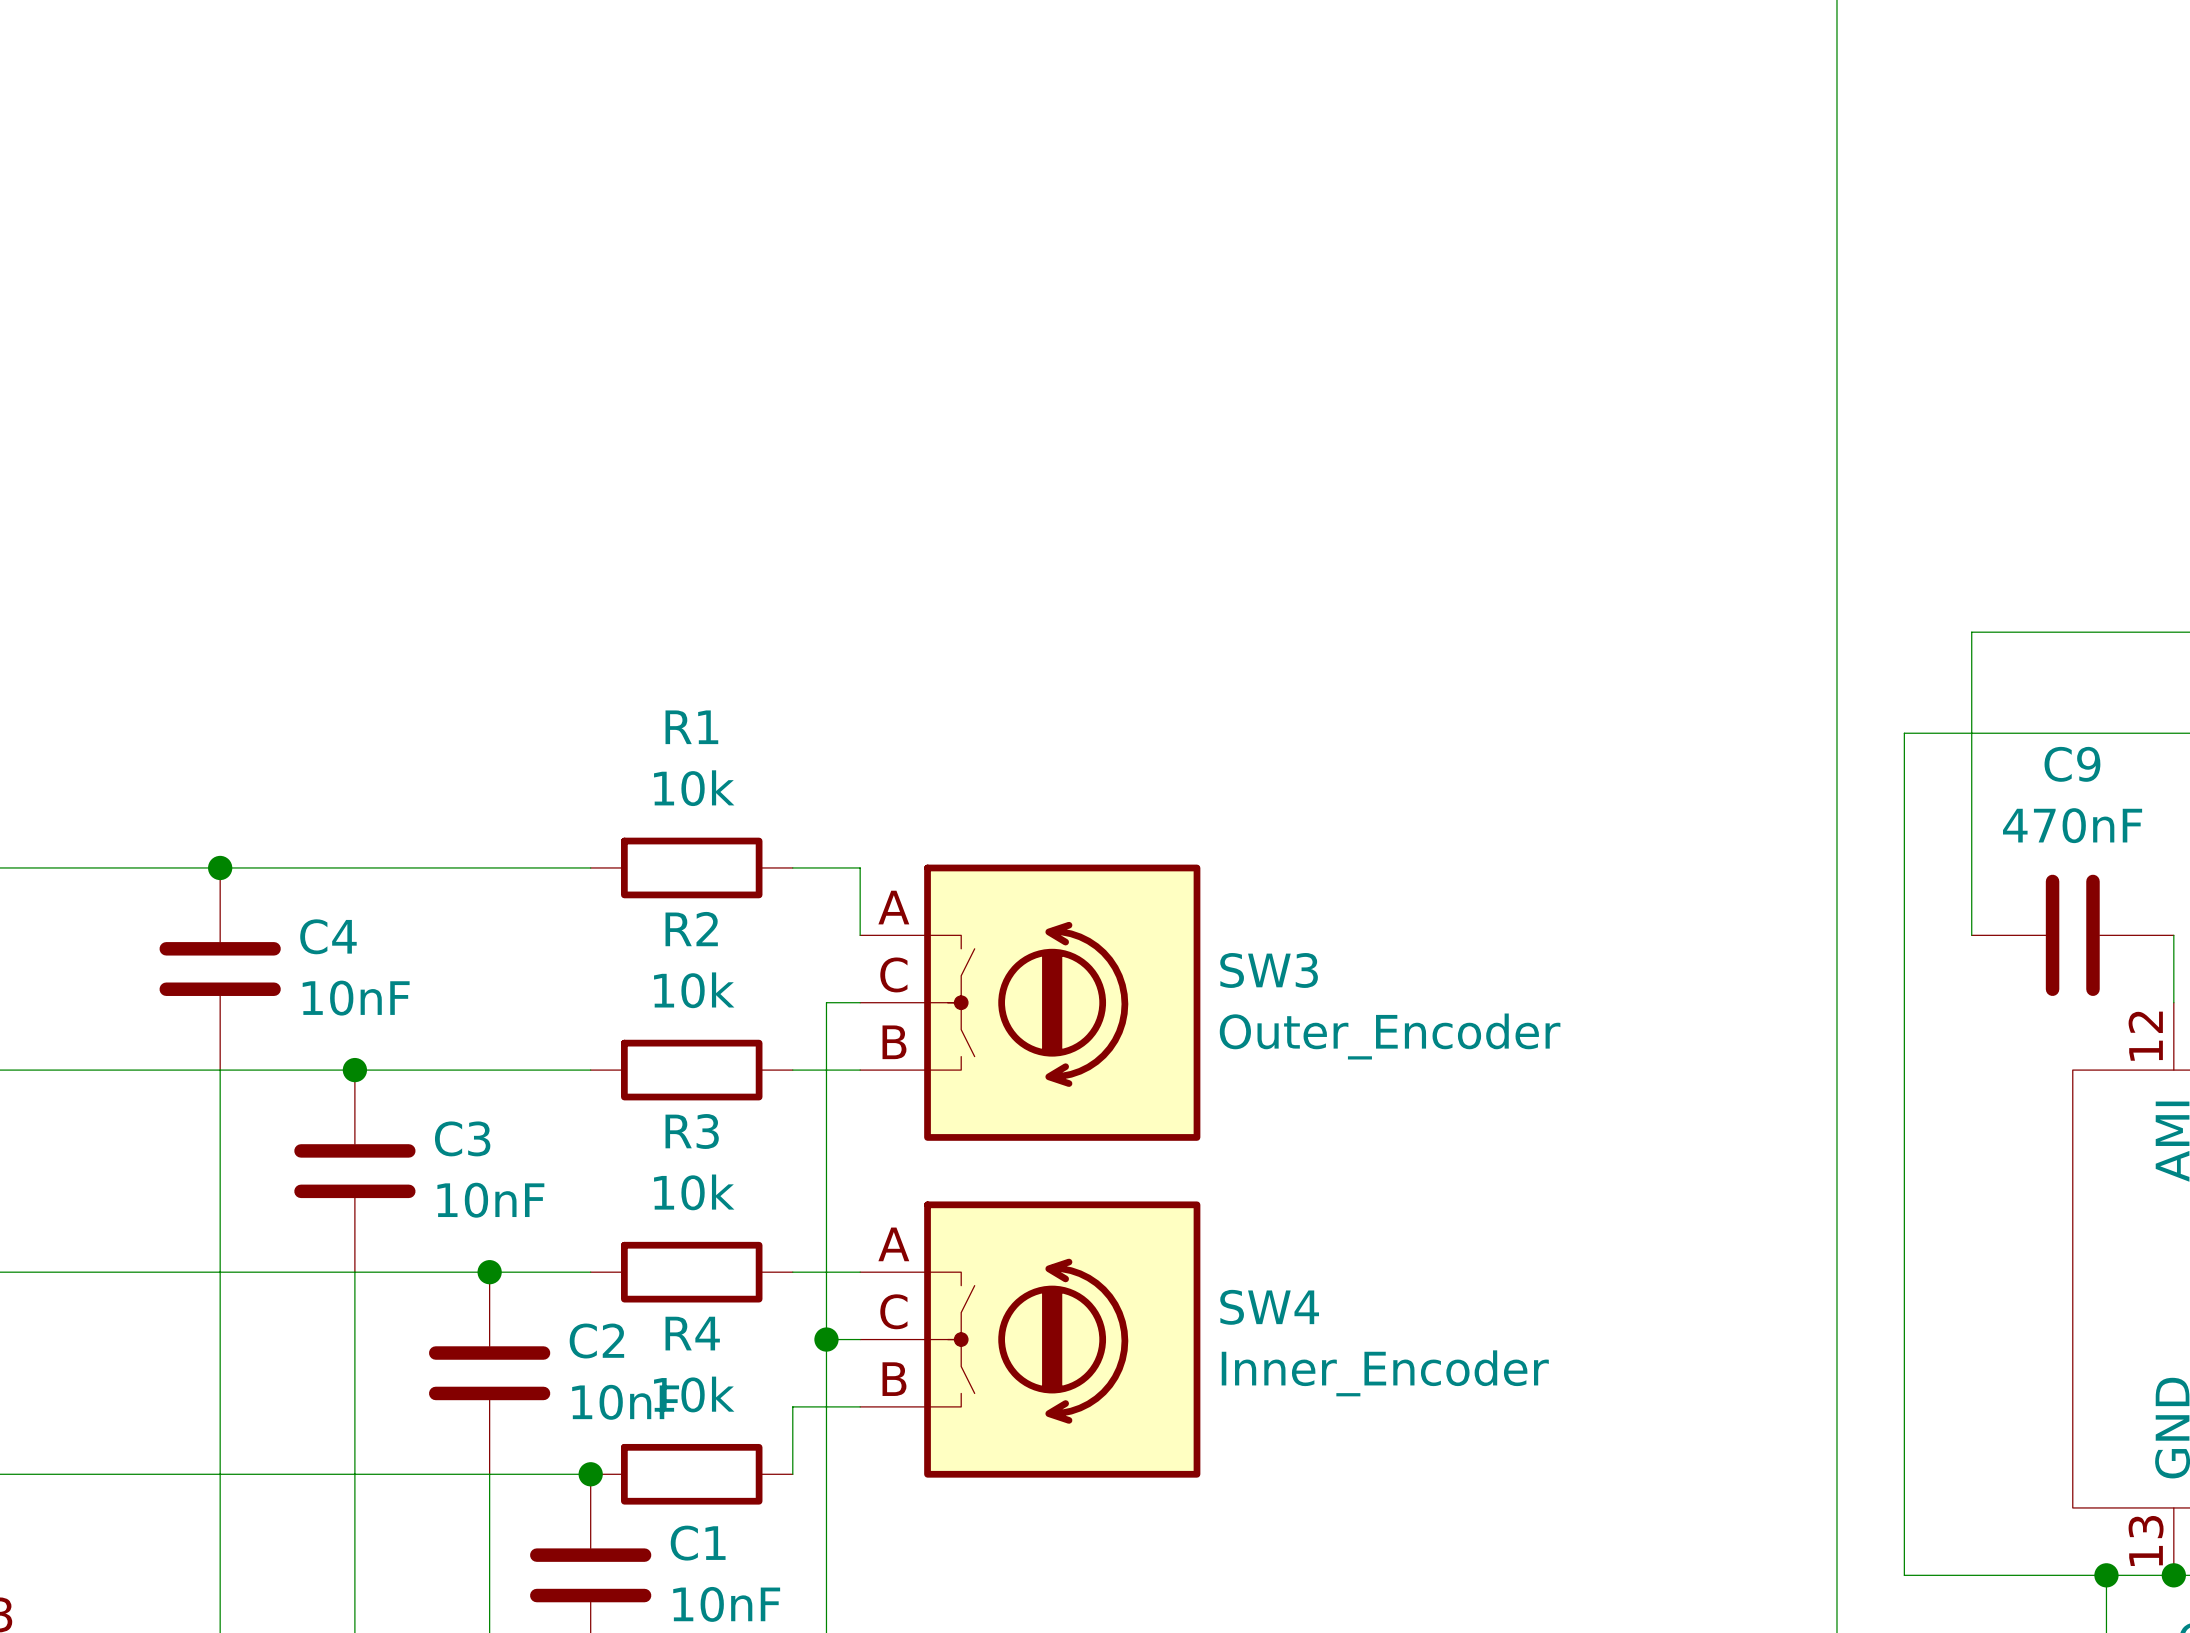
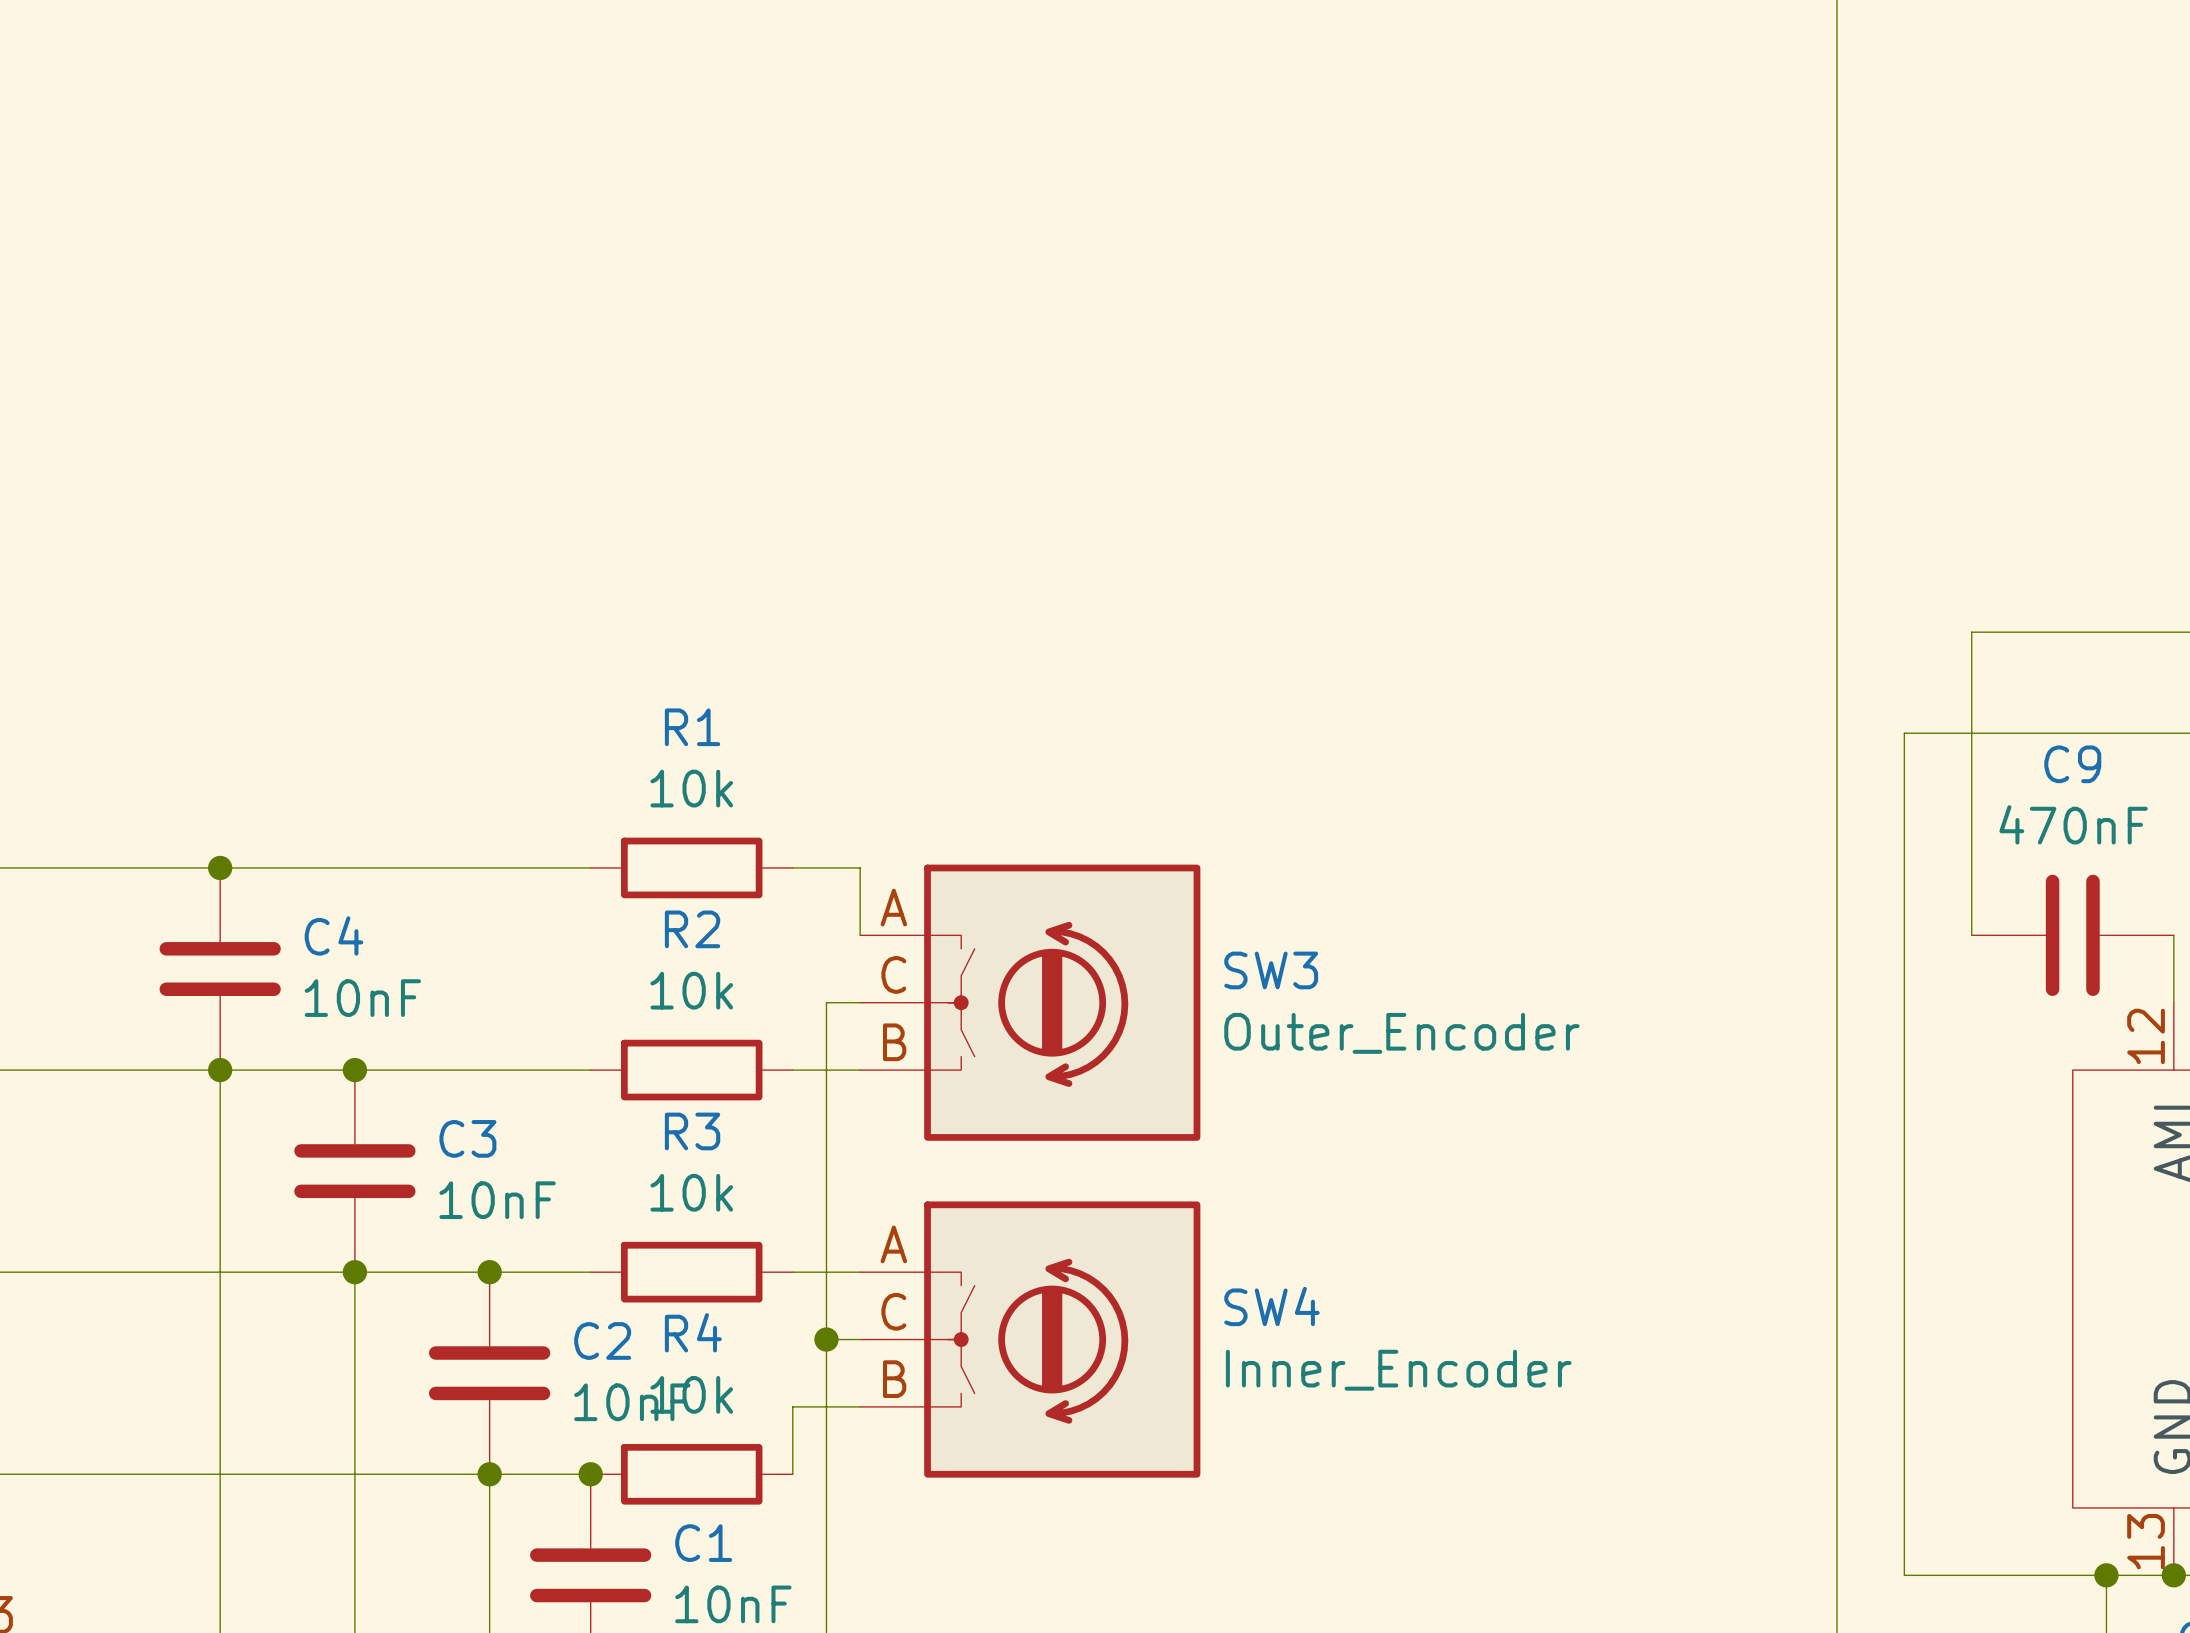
junction: none -> (220, 1070)
junction: none -> (354, 1272)
junction: none -> (489, 1474)

